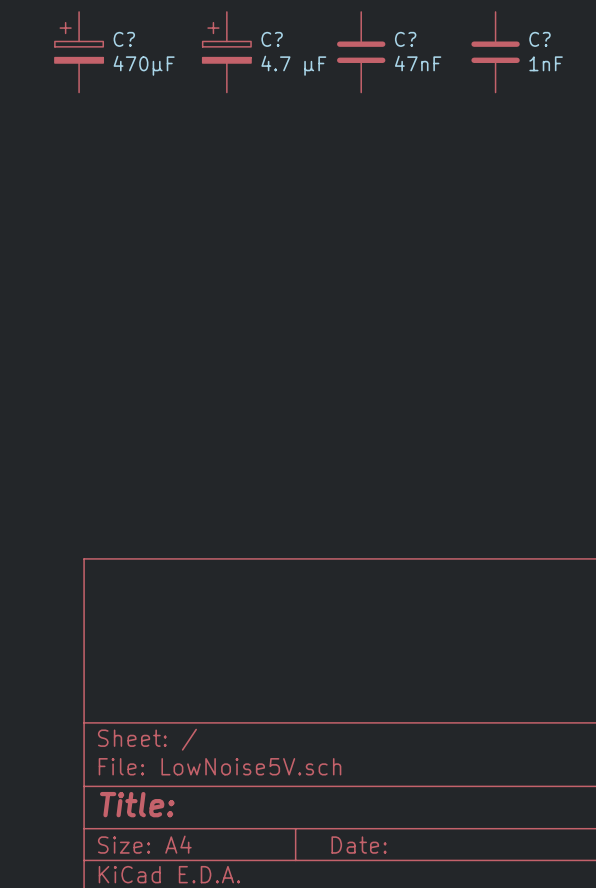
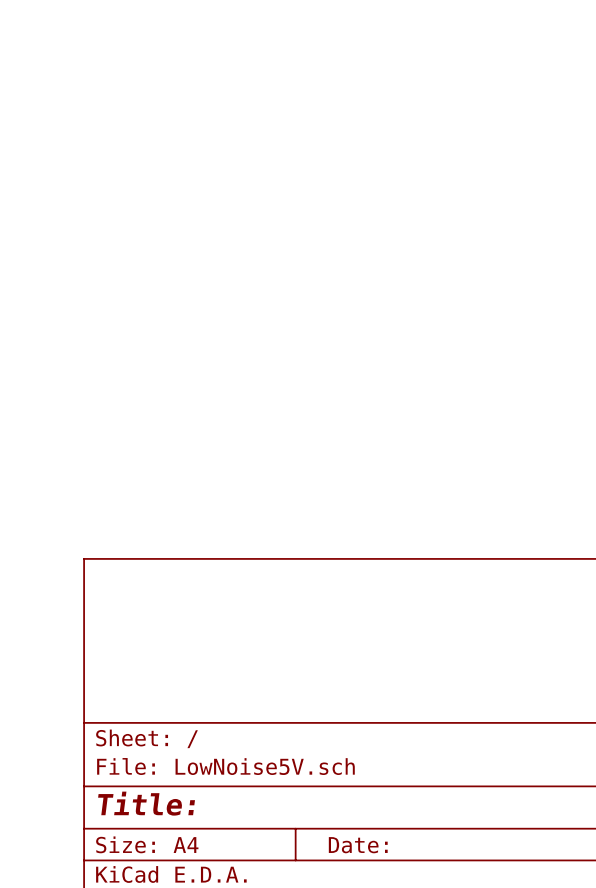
C?: 470µF (79, 52) -> none
C?: 4.7 µF (226, 52) -> none
C?: 47nF (361, 52) -> none
C?: 1nF (495, 52) -> none

